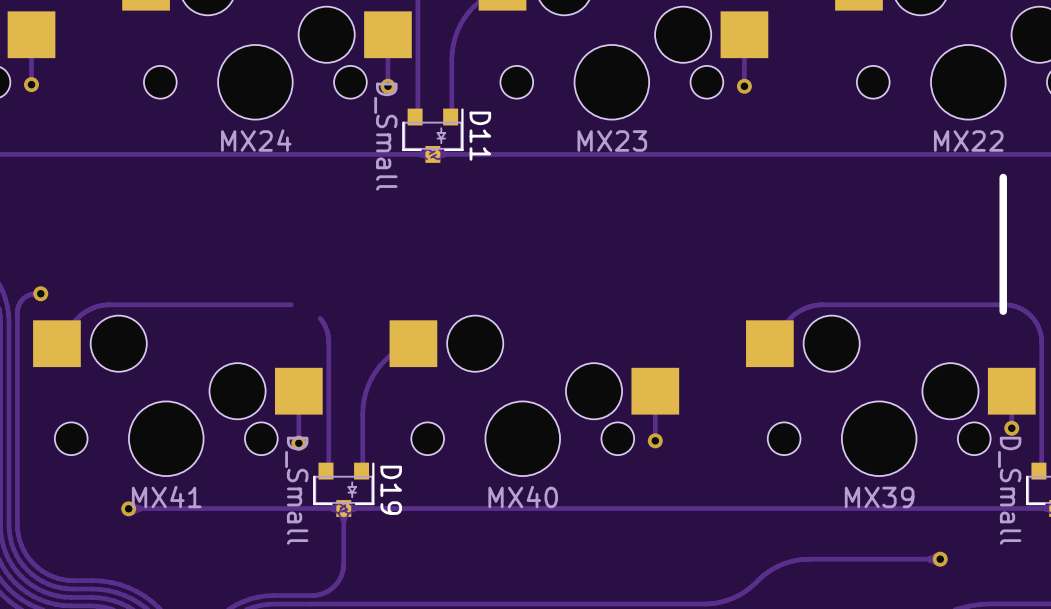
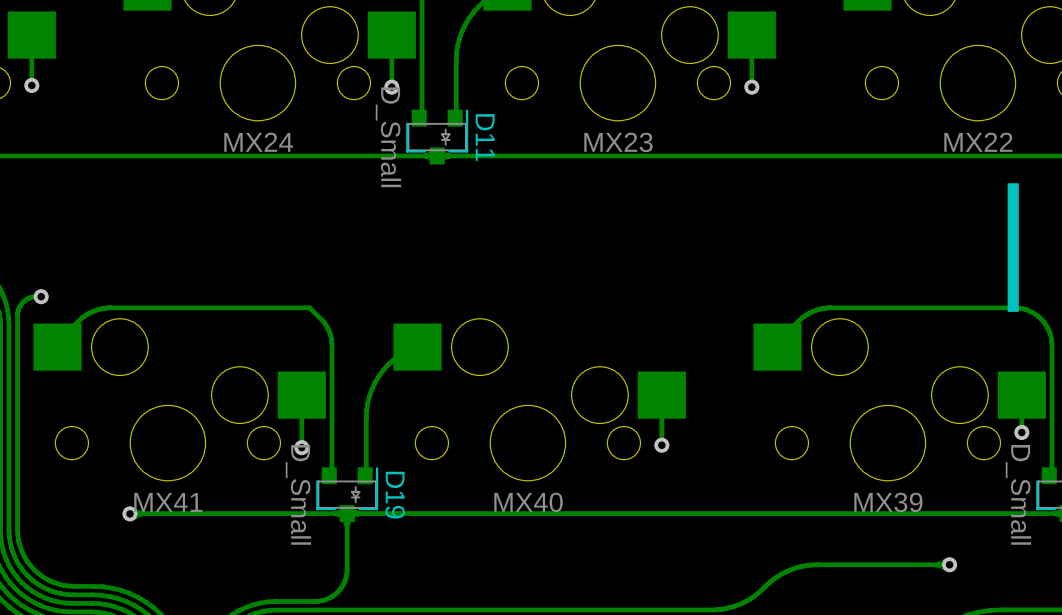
track: none -> (294, 307) (309, 307) (323, 321)

